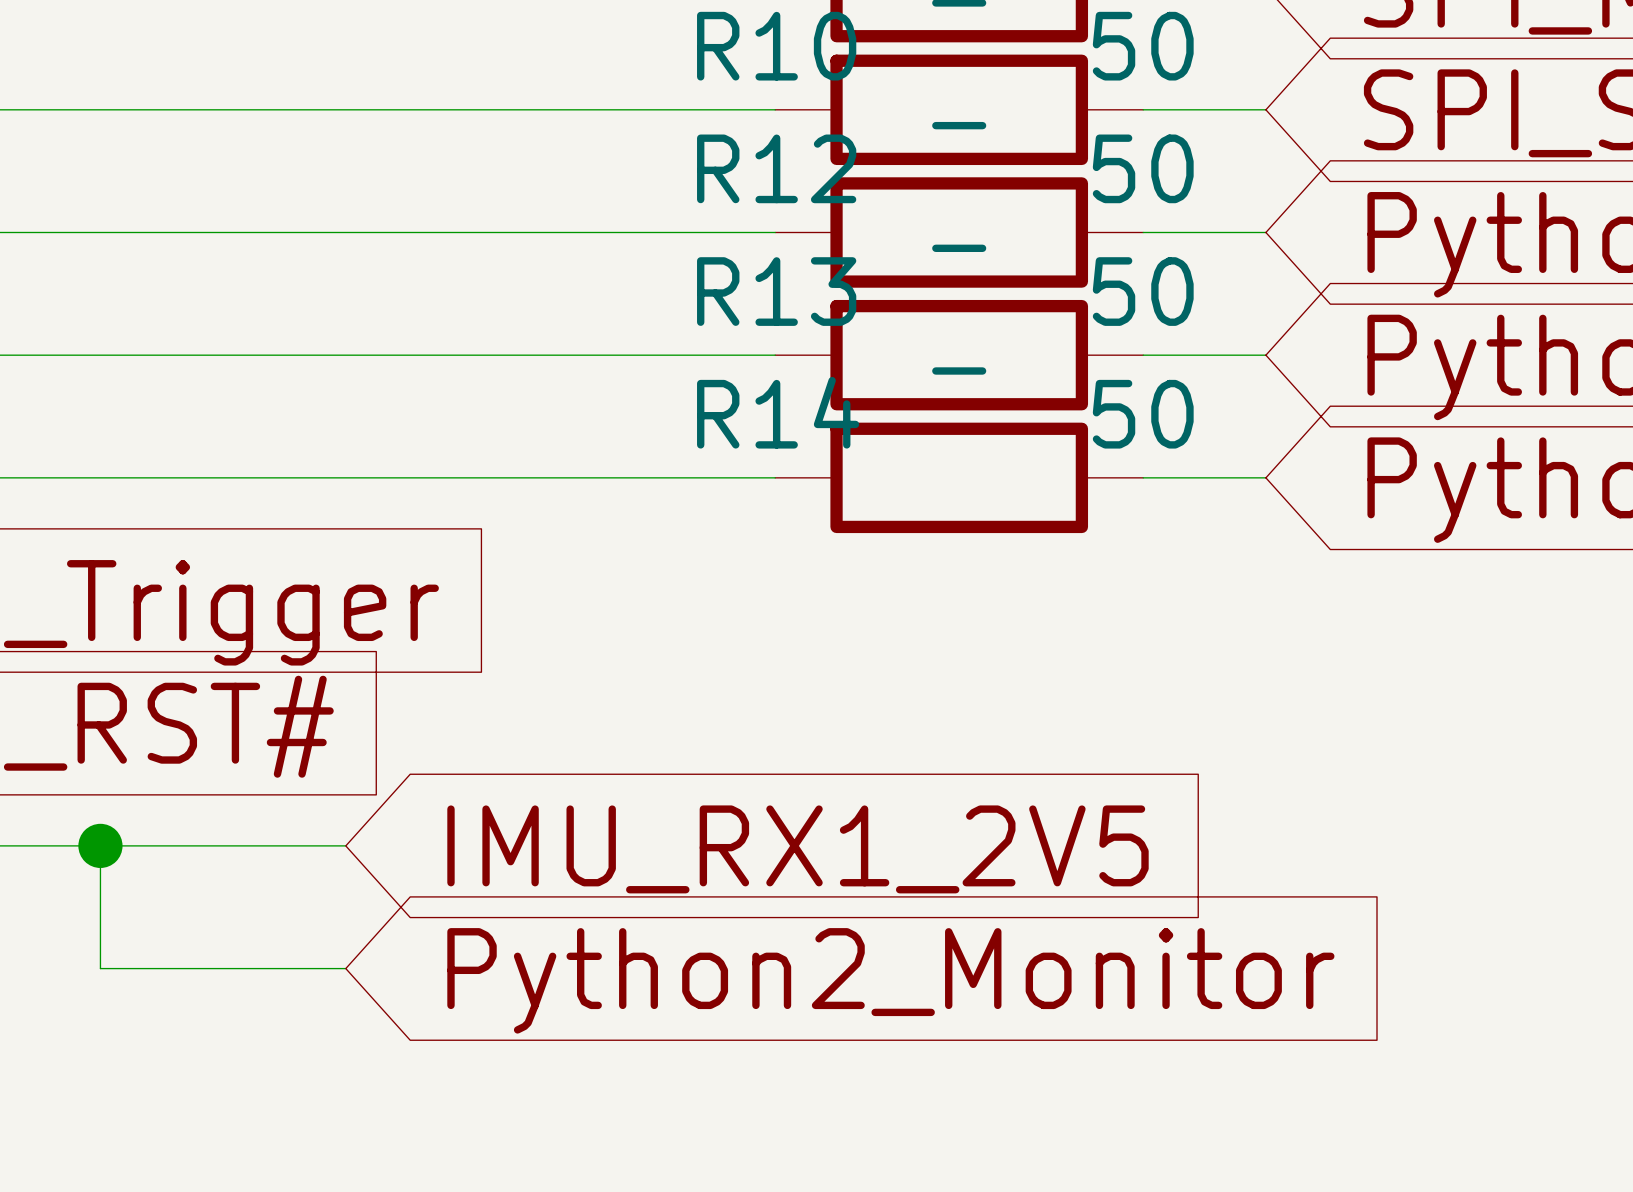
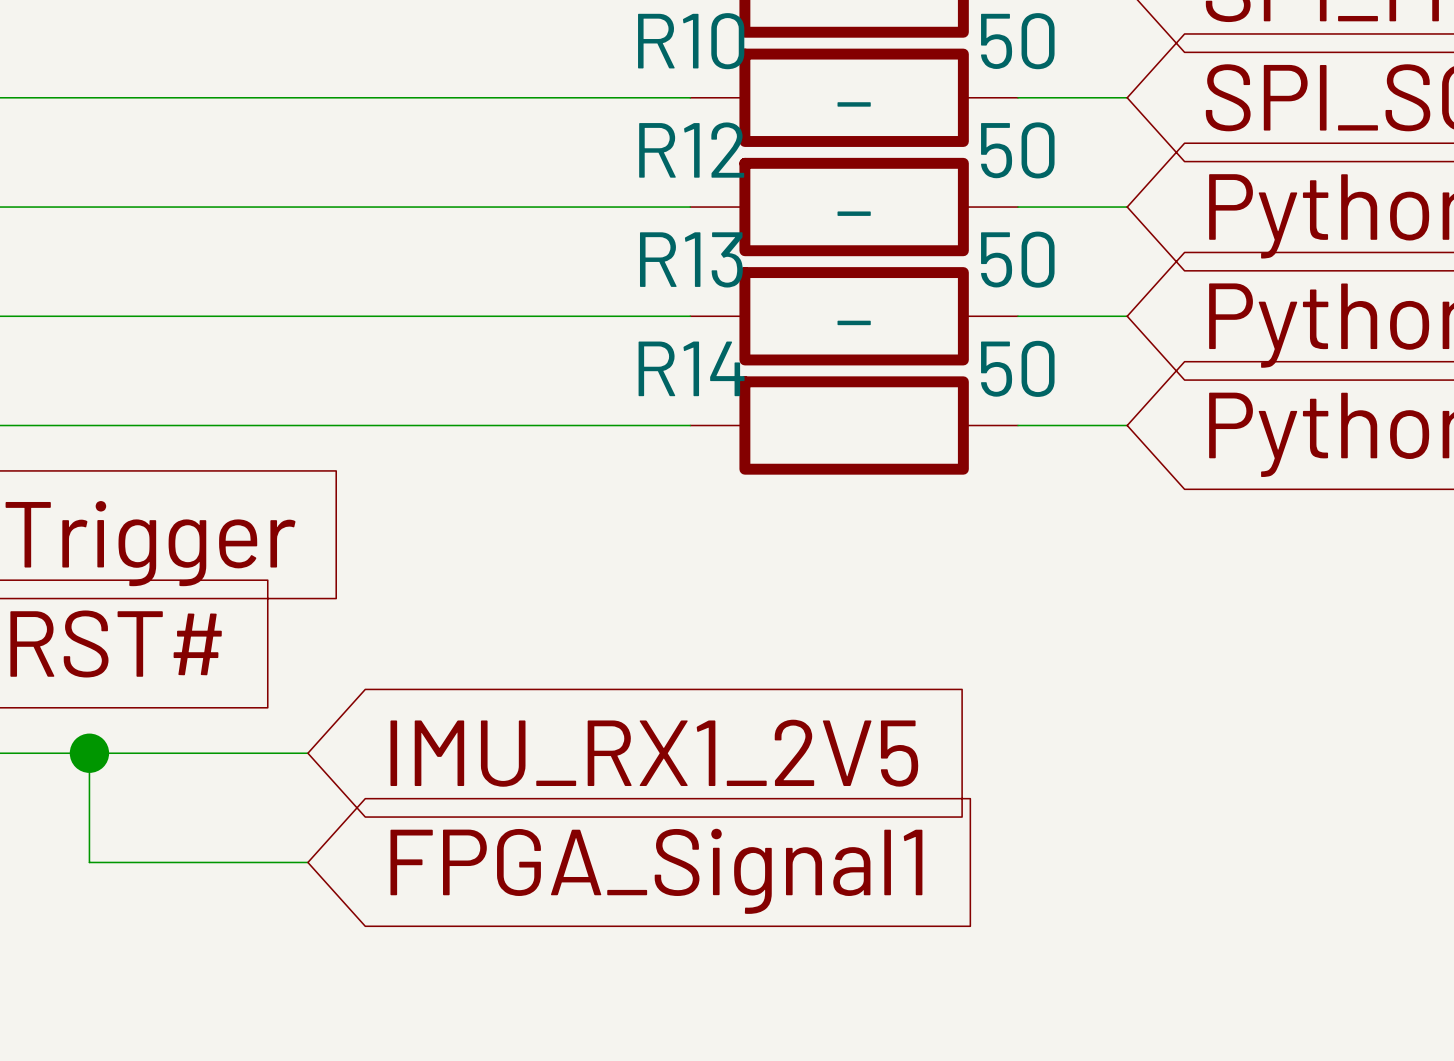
global label: Python2_Monitor (890, 980) -> FPGA_Signal1 (656, 871)

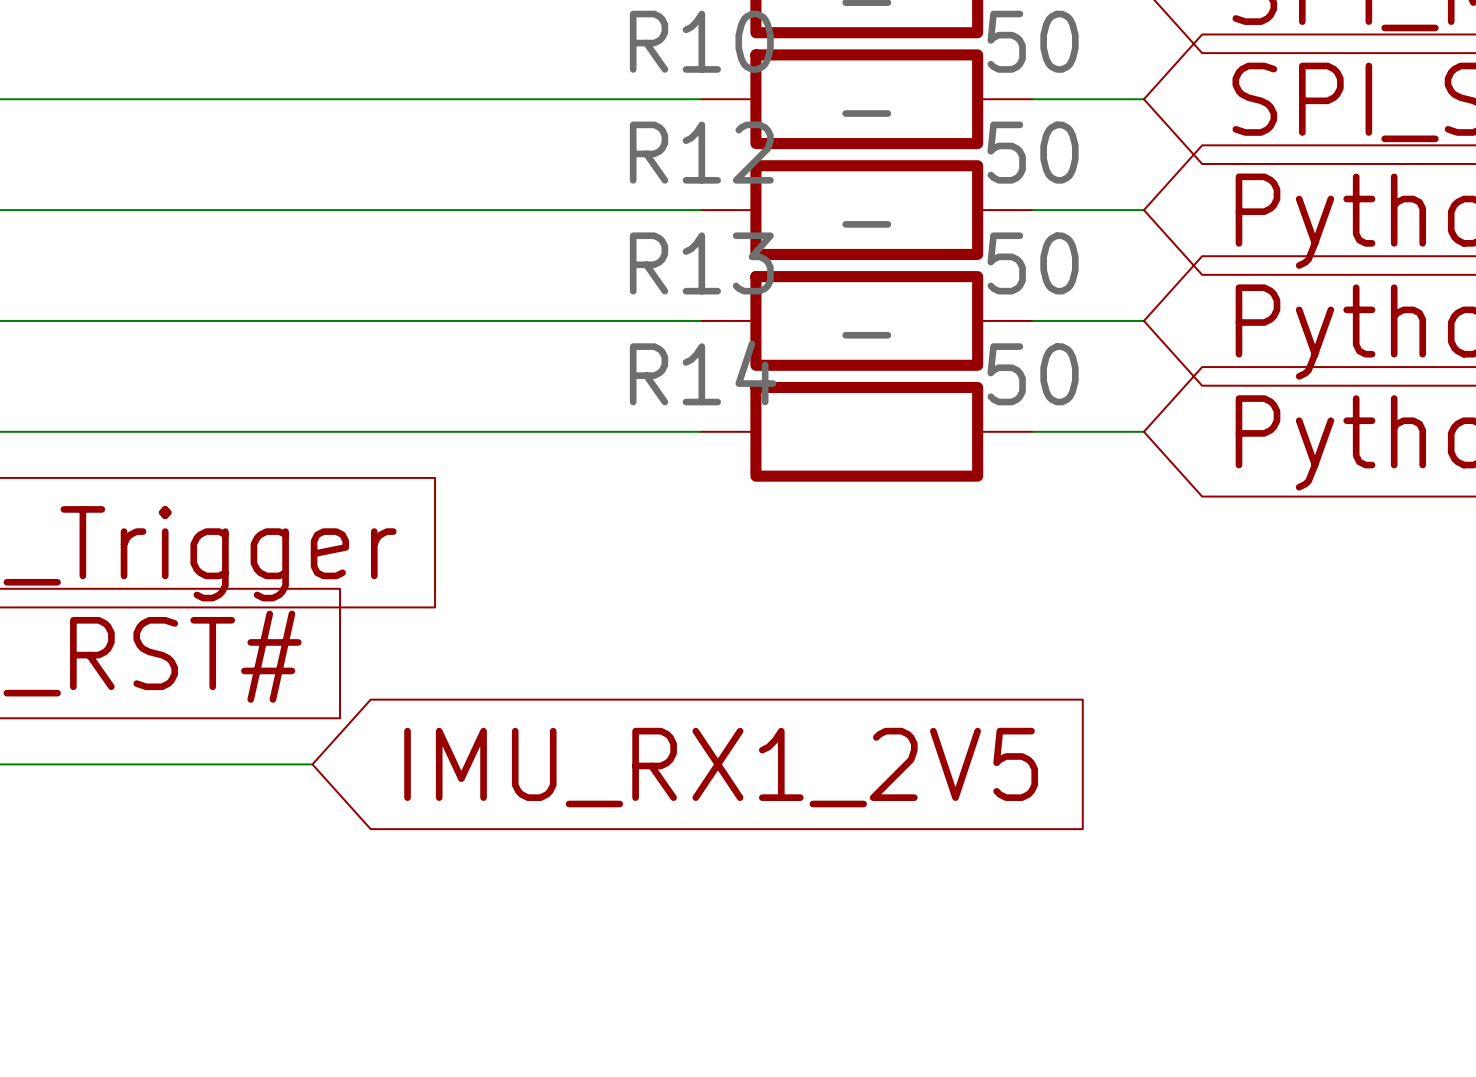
wire: (89, 753) (89, 862) (307, 862) -> none
junction: (89, 753) -> none
global label: FPGA_Signal1 (656, 871) -> none

